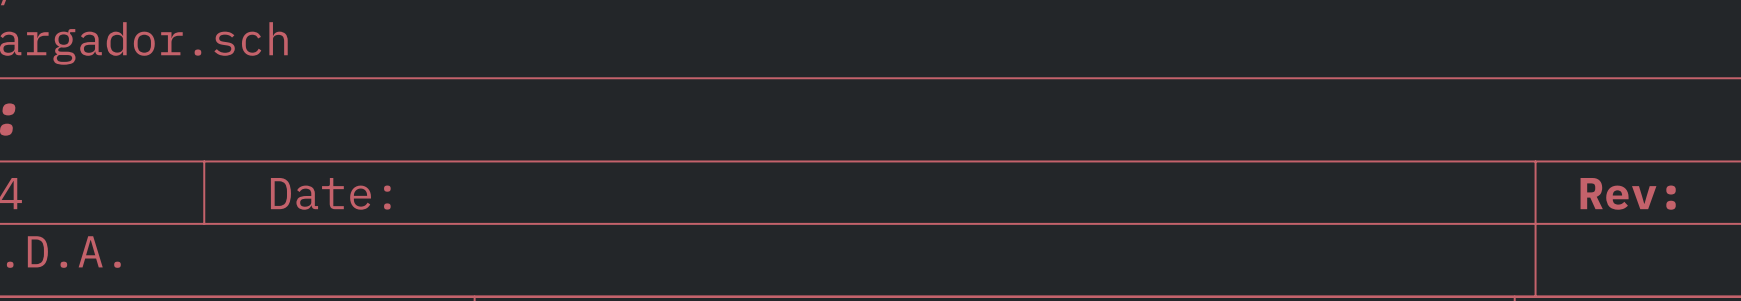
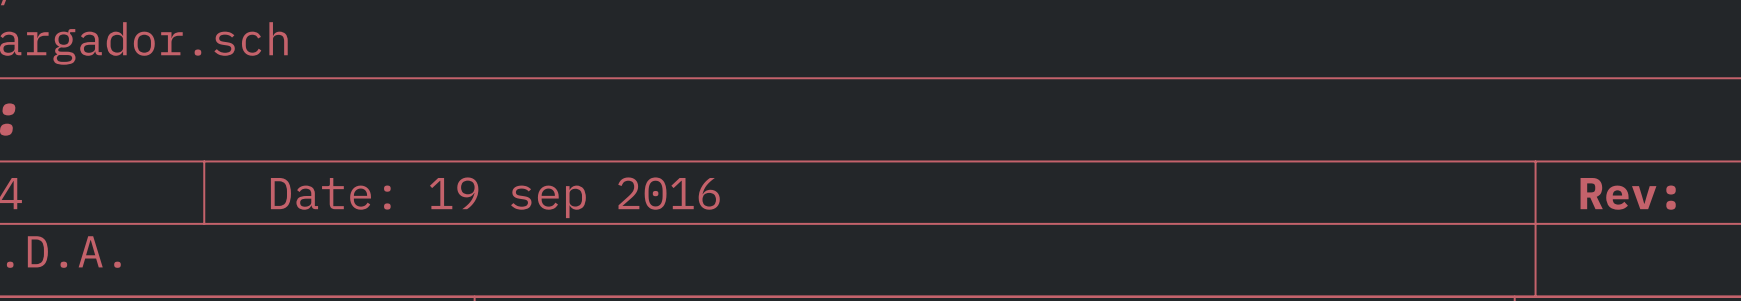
title block: Date: (330, 193) -> Date: 19 sep 2016 (495, 197)

